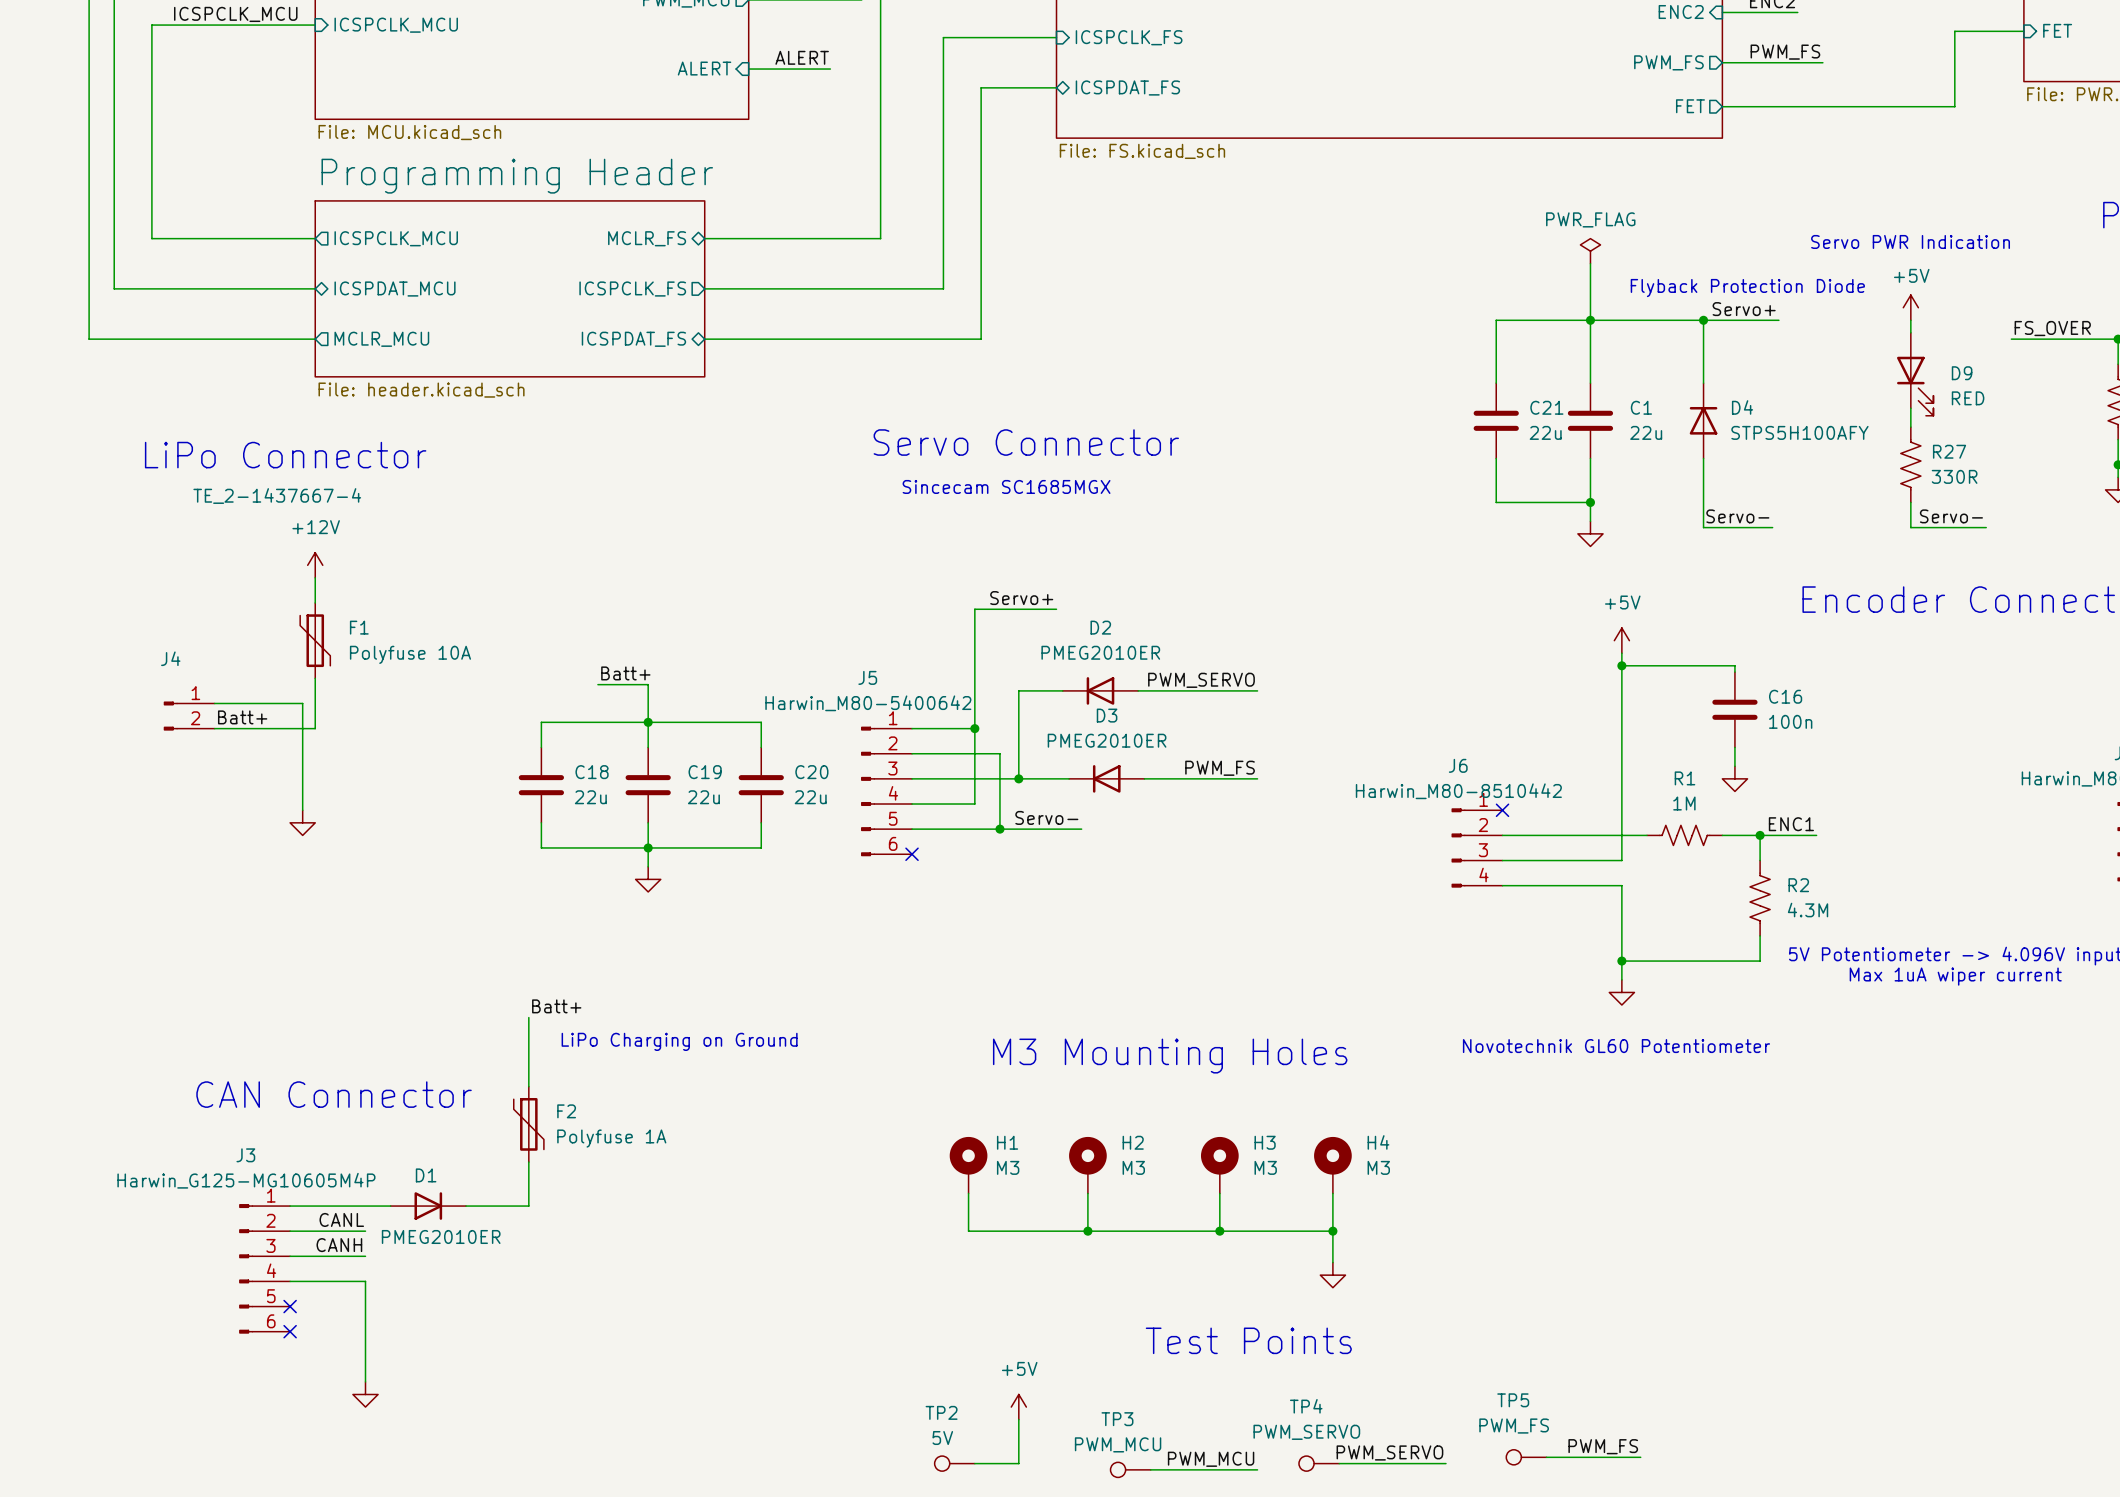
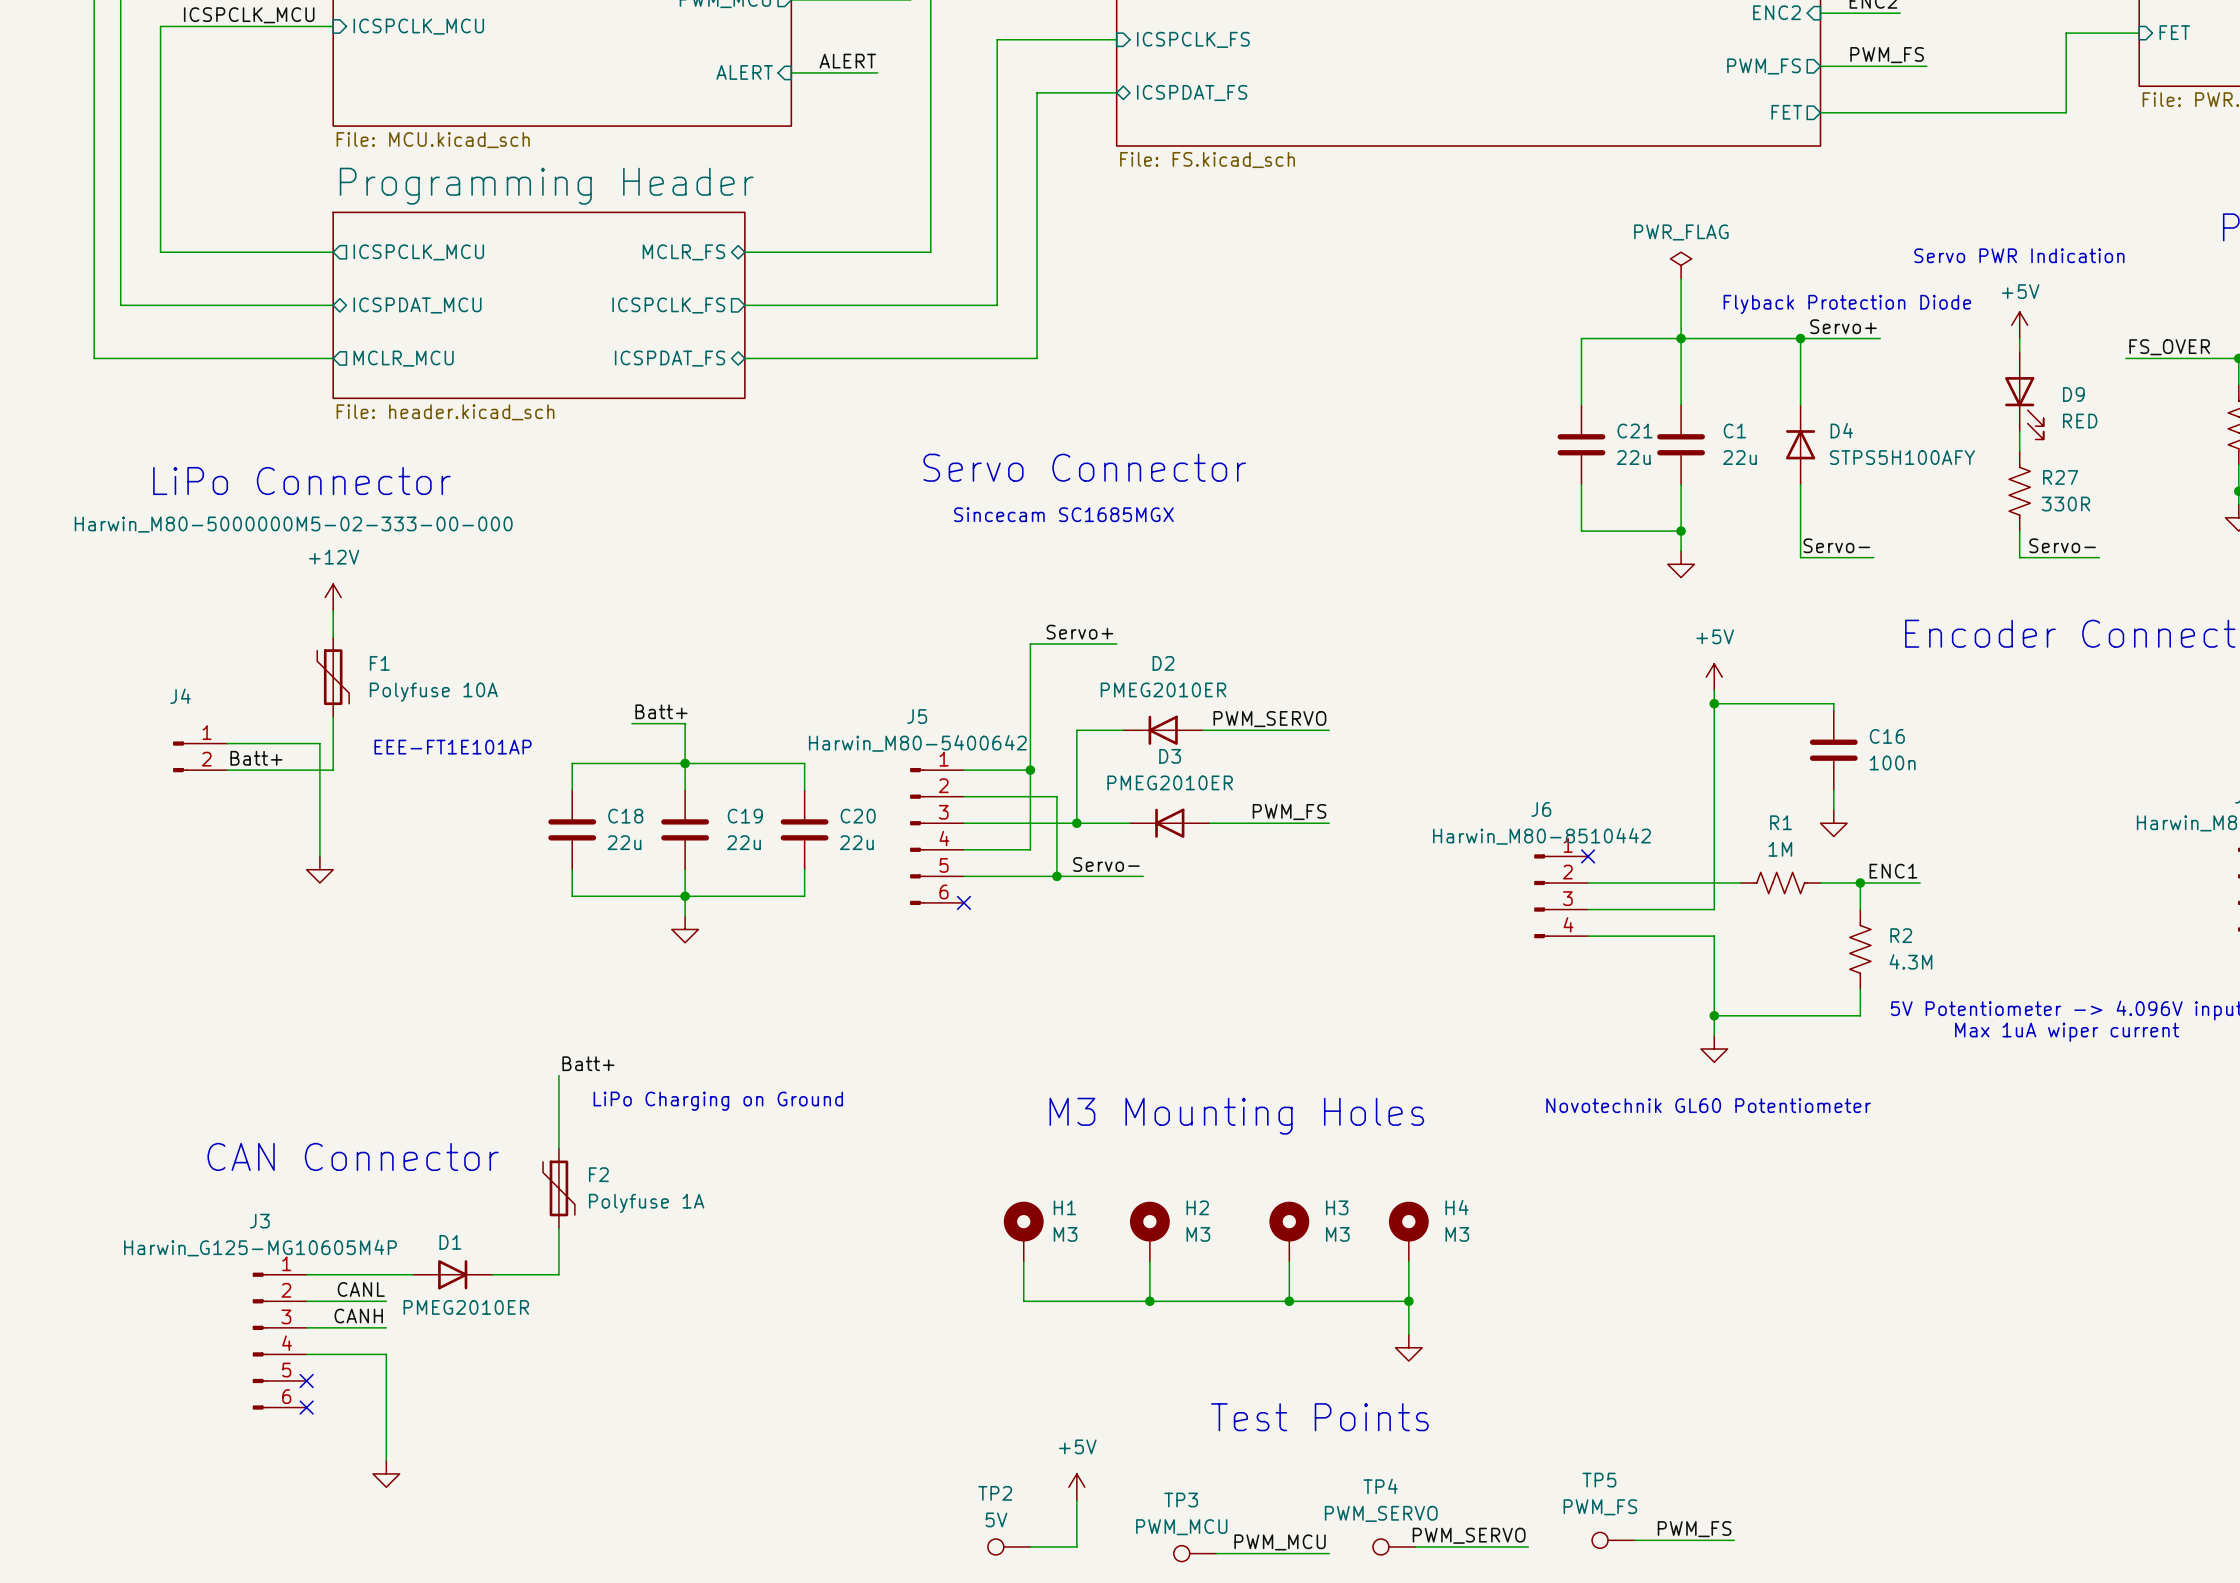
J4 value: TE_2-1437667-4 (277, 496) -> Harwin_M80-5000000M5-02-333-00-000 (293, 524)
text: none -> EEE-FT1E101AP (453, 747)

